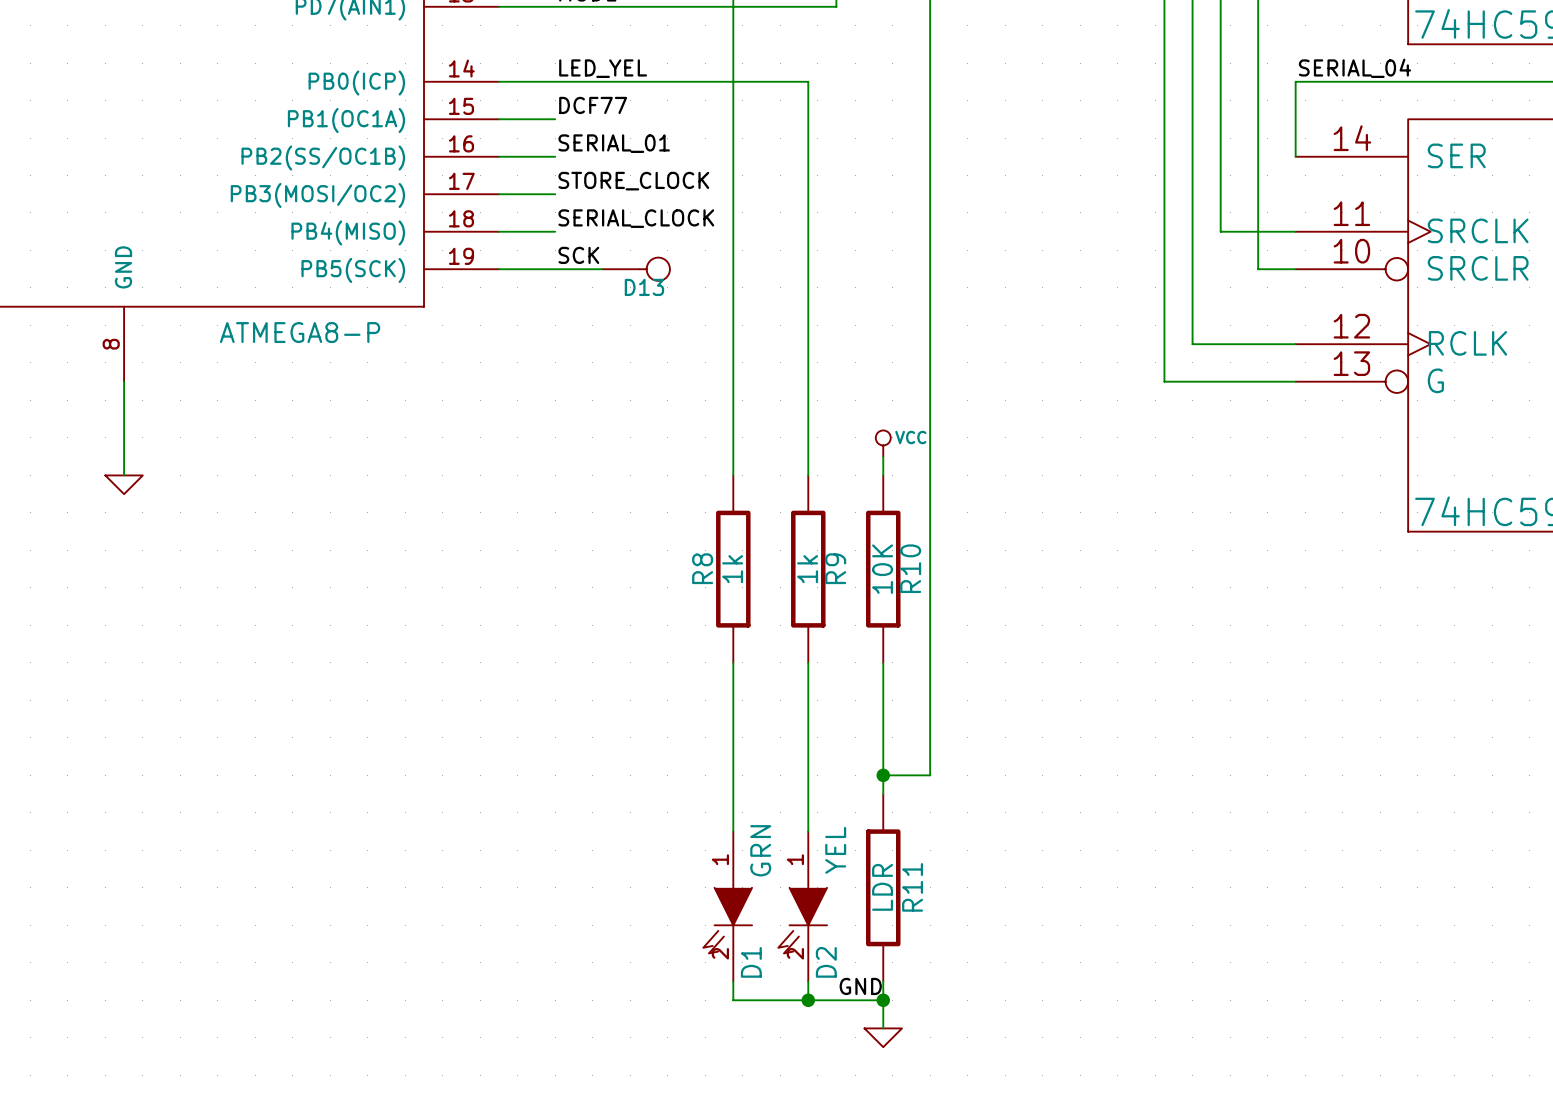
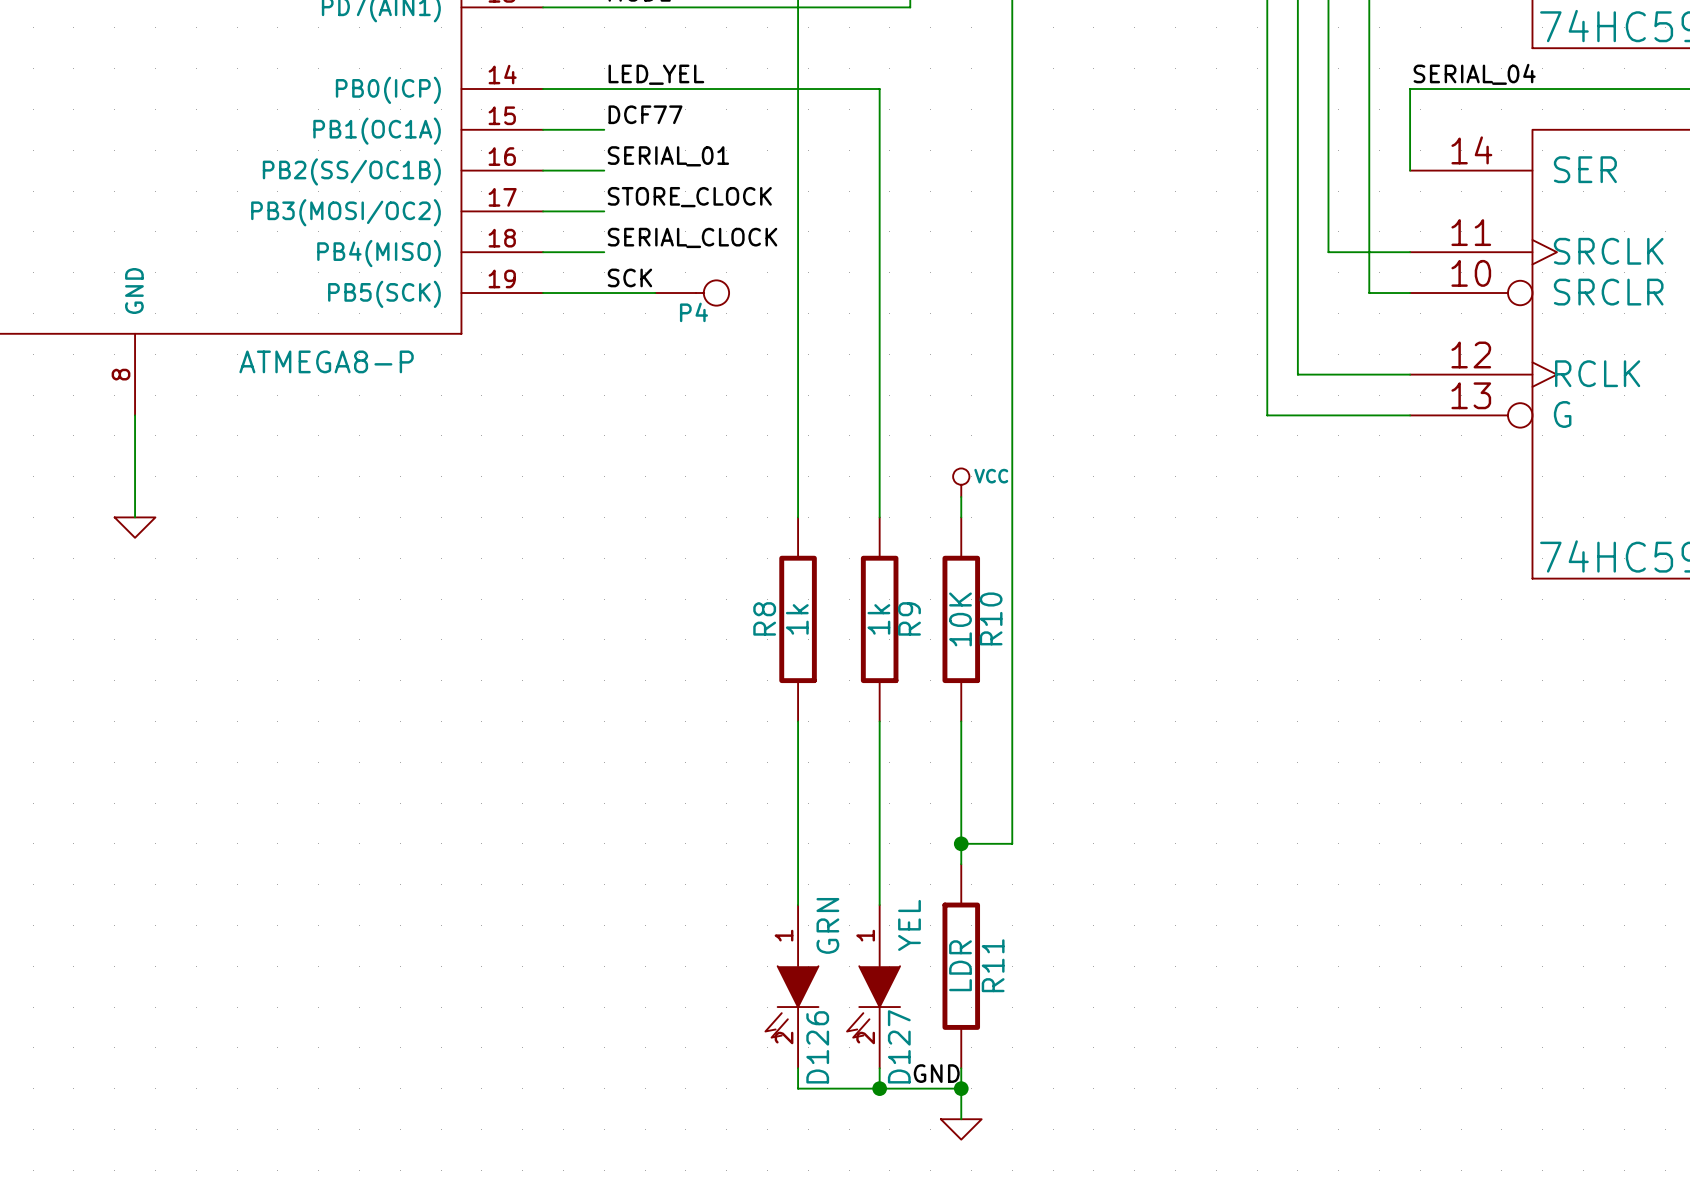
D13 name: D13 (644, 287) -> P4 (693, 312)
D1 name: D1 (751, 962) -> D126 (817, 1047)
D2 name: D2 (826, 962) -> D127 (899, 1046)

